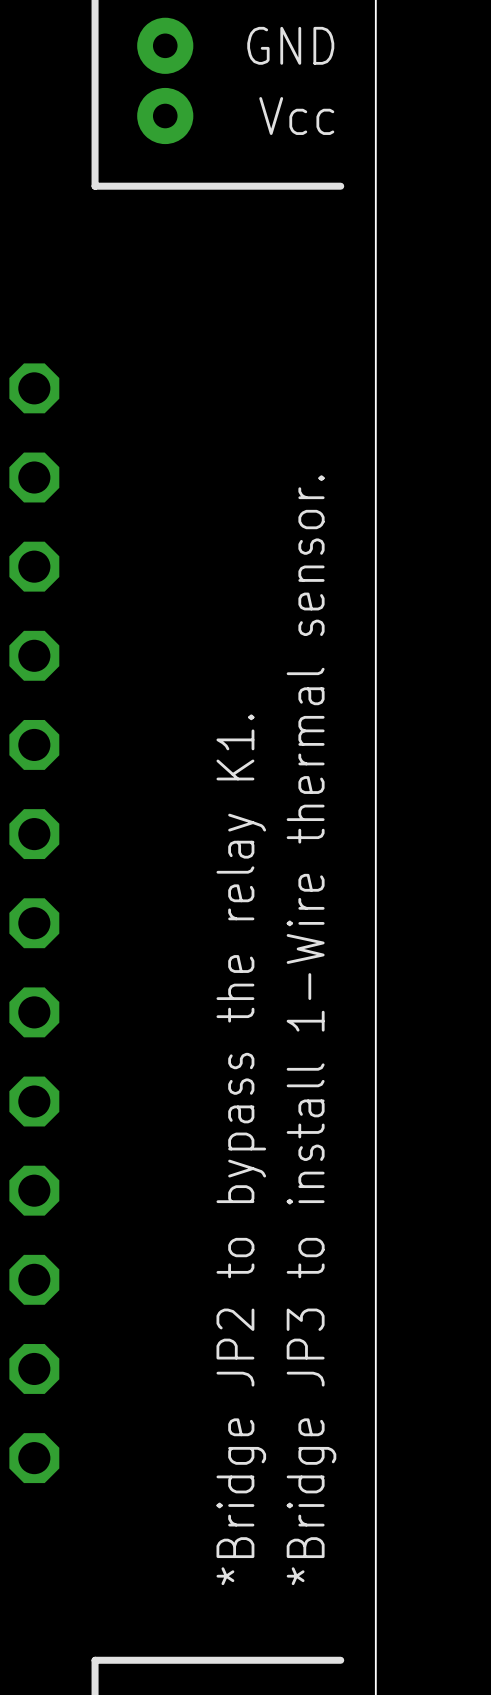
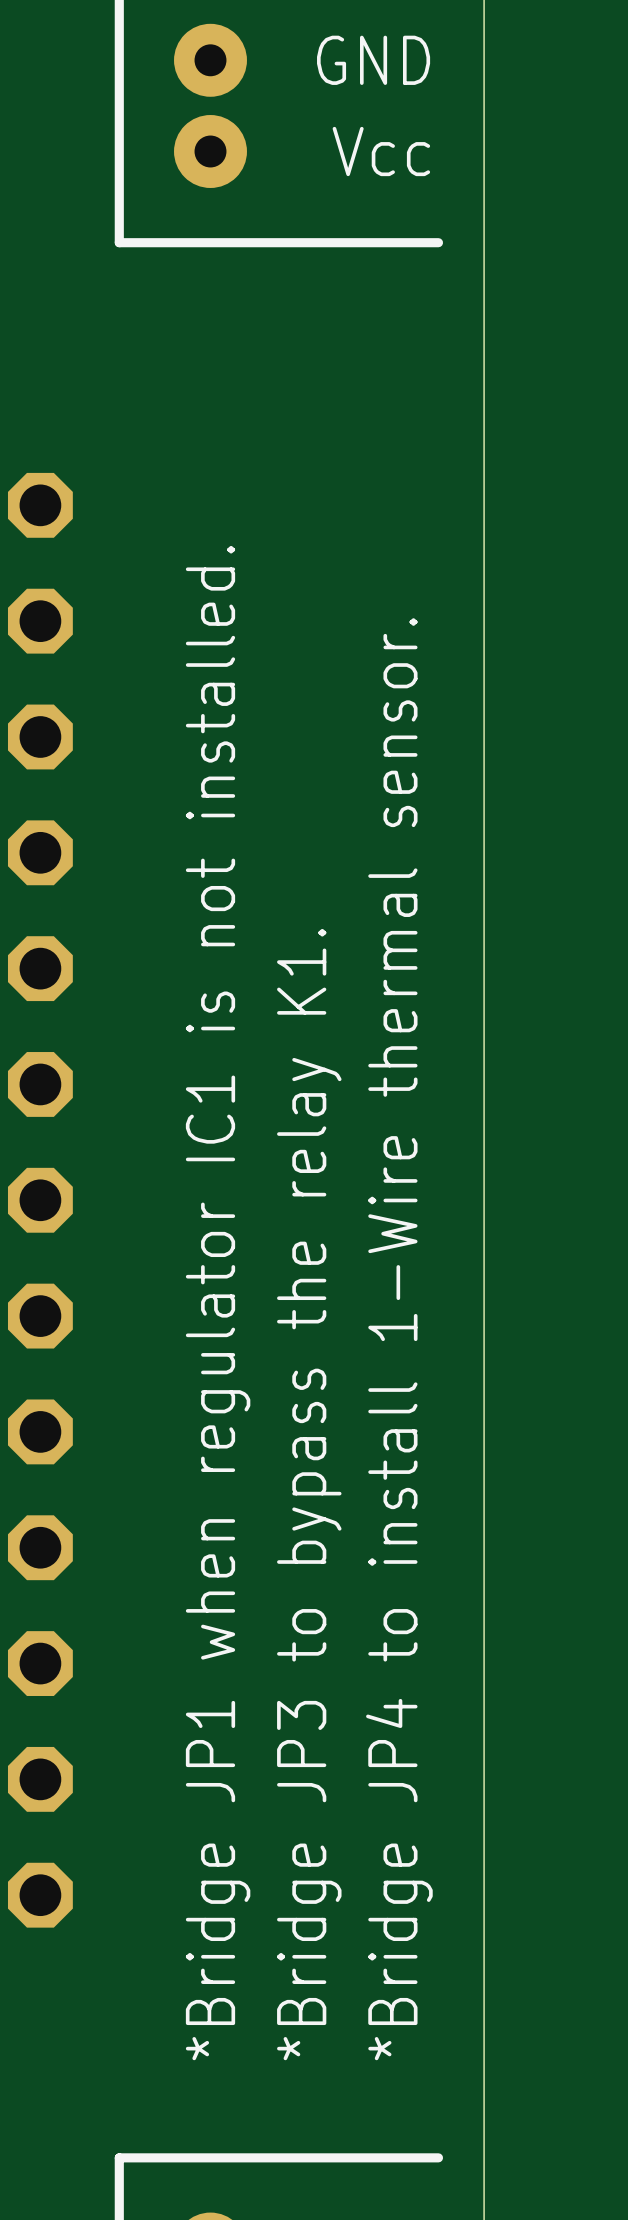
text: none -> *Bridge JP1 when regulator IC1 is not installed. (218, 1303)
text: *Bridge JP3 to install 1-Wire thermal sensor. (311, 1030) -> *Bridge JP4 to install 1-Wire thermal sensor. (399, 1339)
text: *Bridge JP2 to bypass the relay K1. (241, 1149) -> *Bridge JP3 to bypass the relay K1. (309, 1494)

